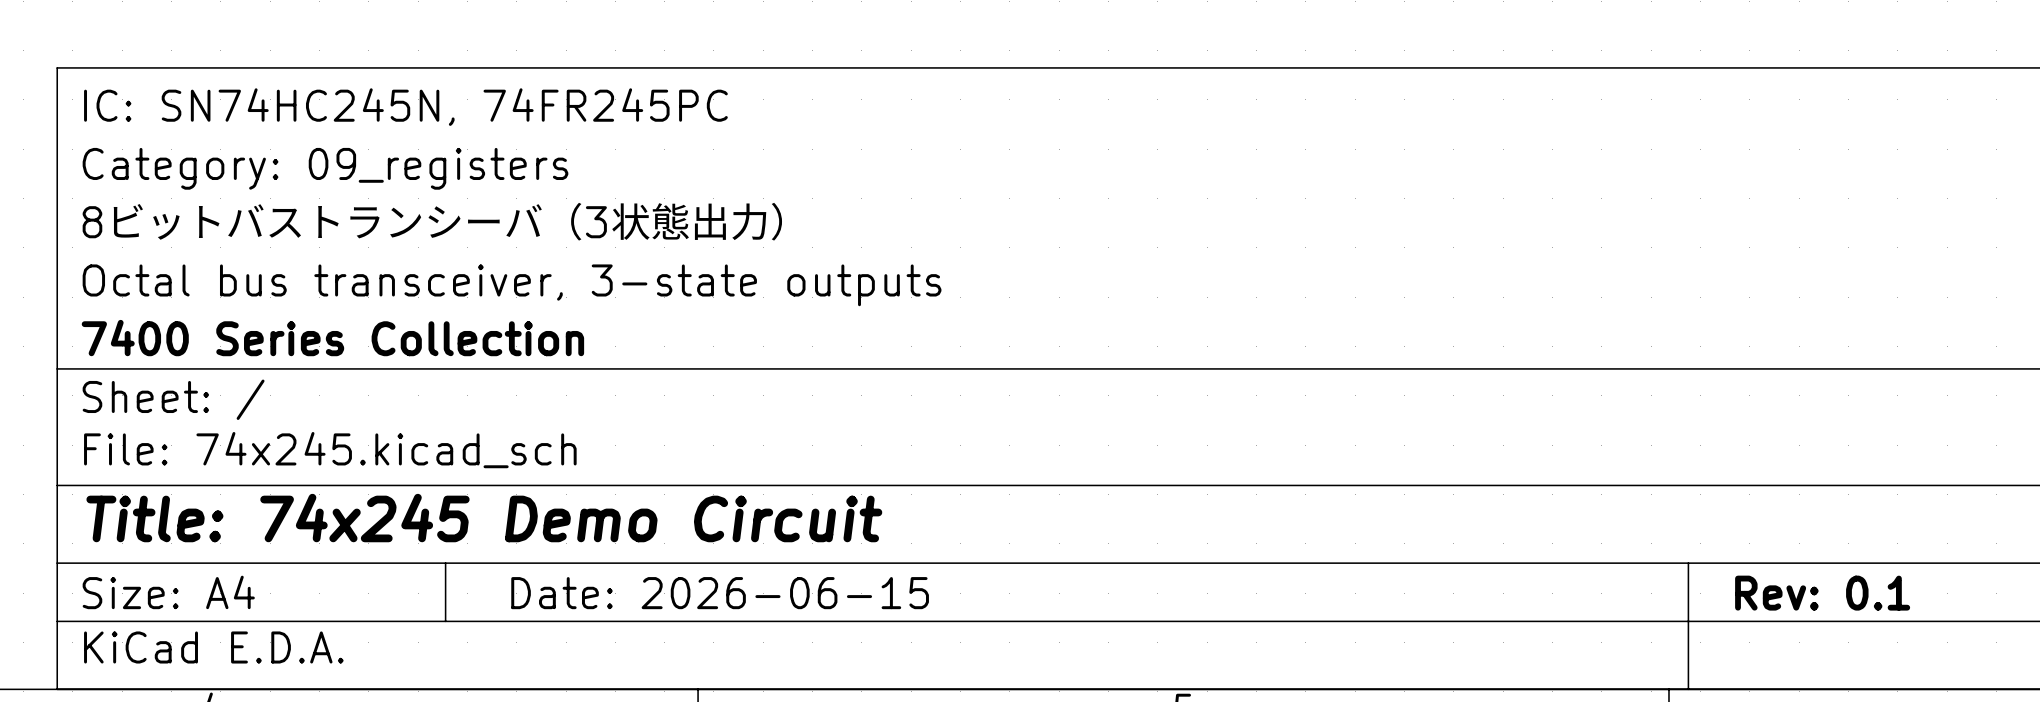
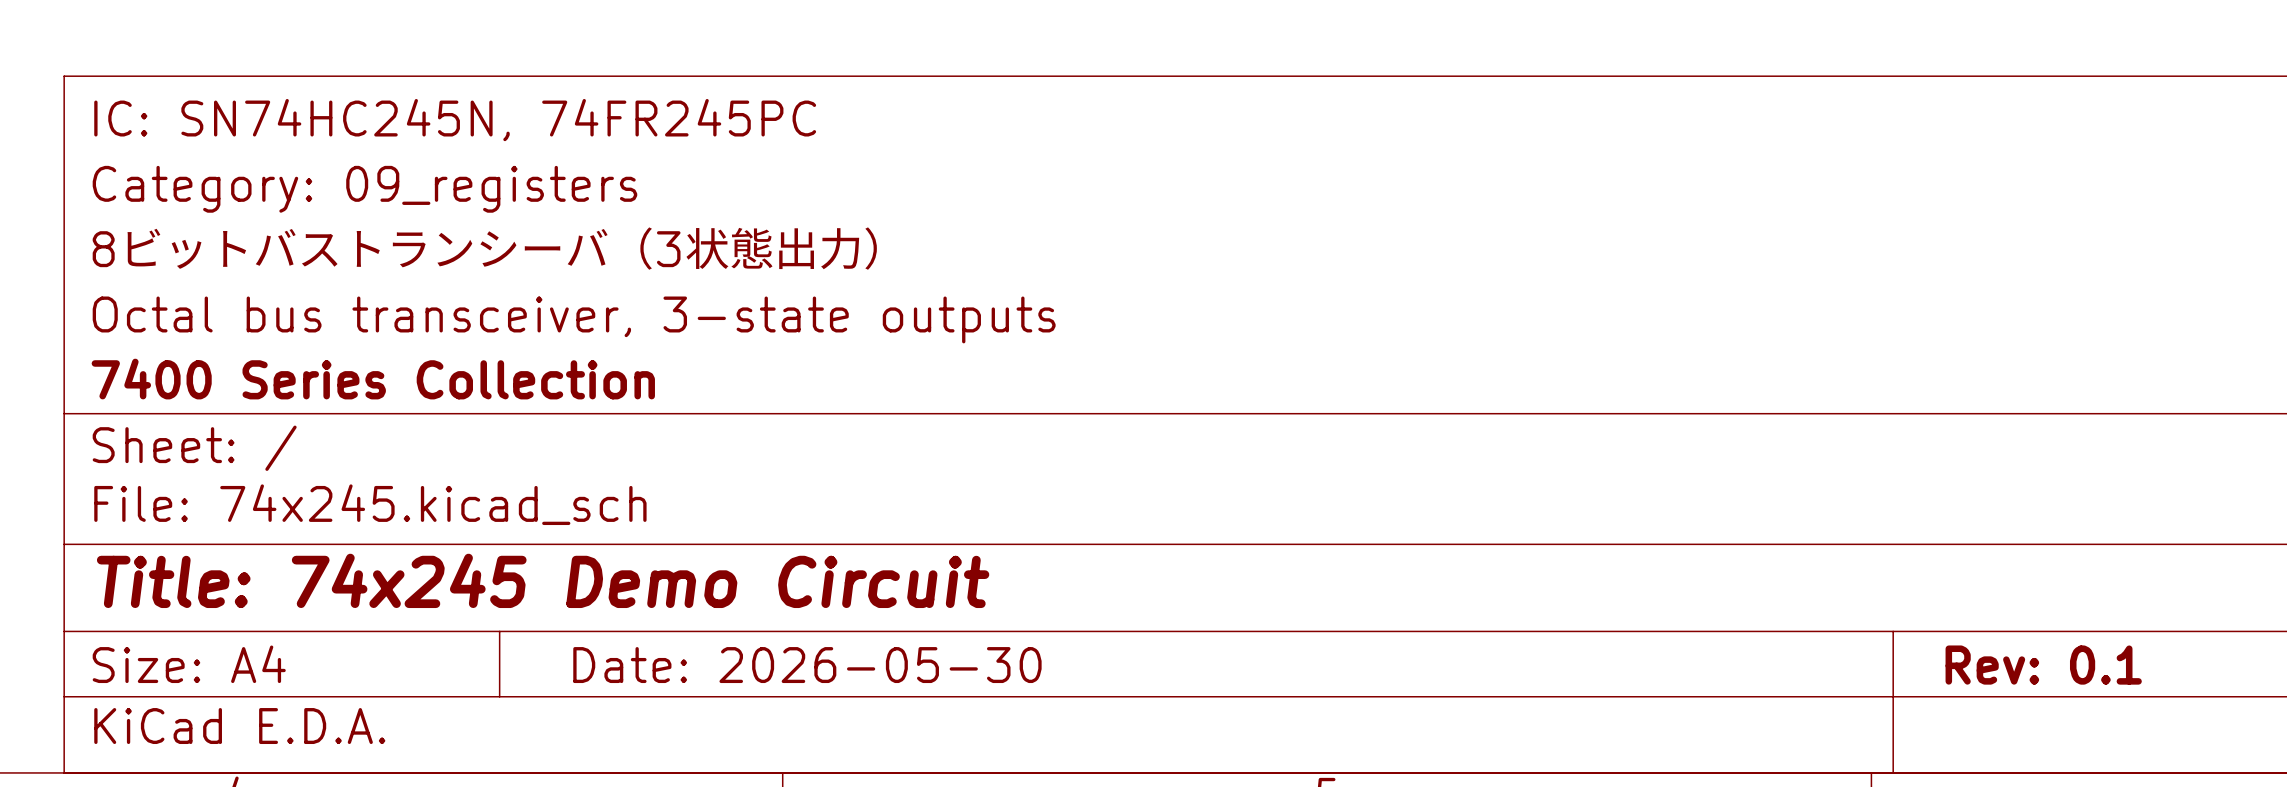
title block: Date: 2026-06-15 (720, 593) -> Date: 2026-05-30 (807, 665)

